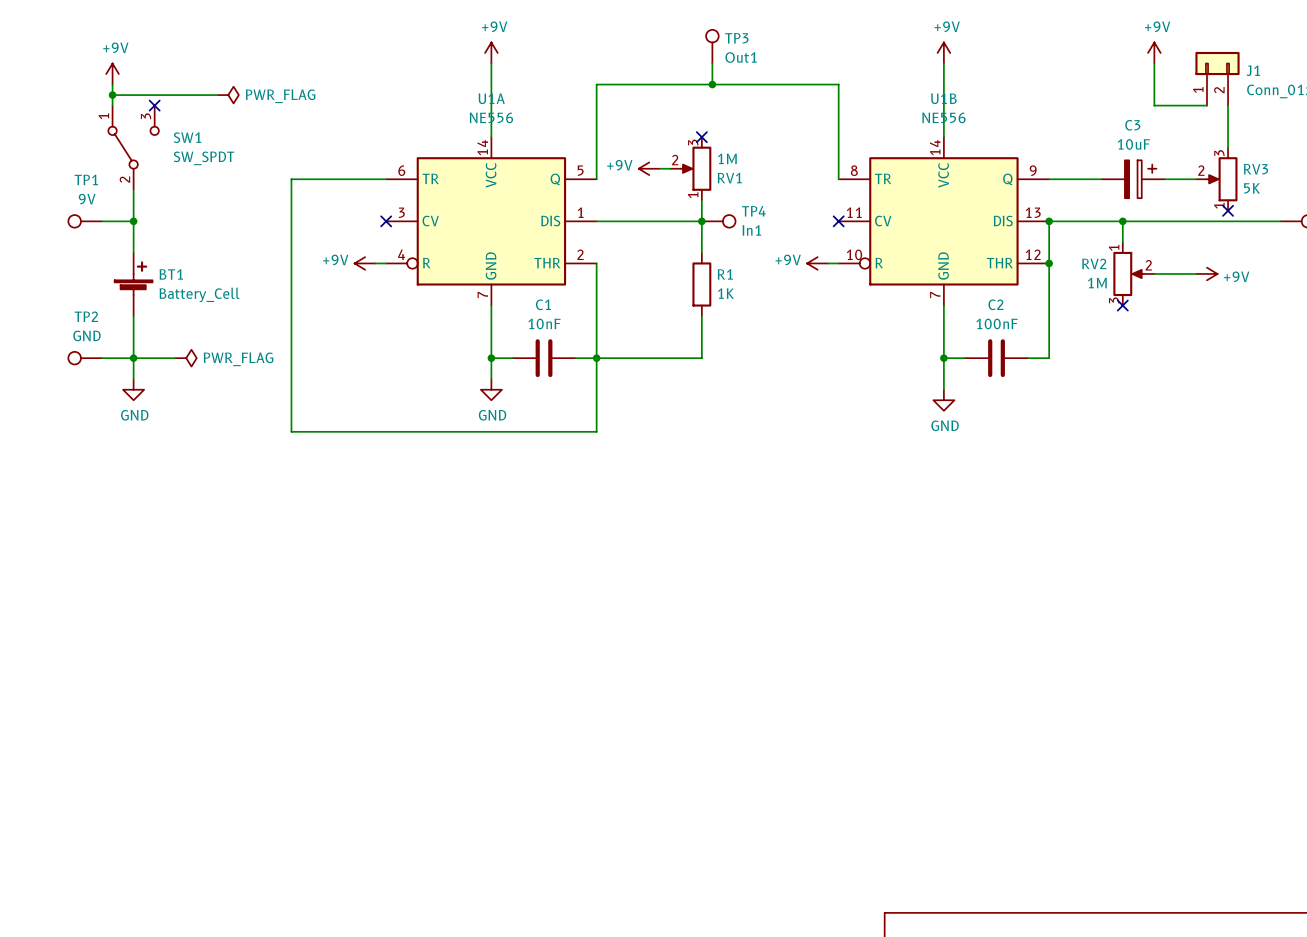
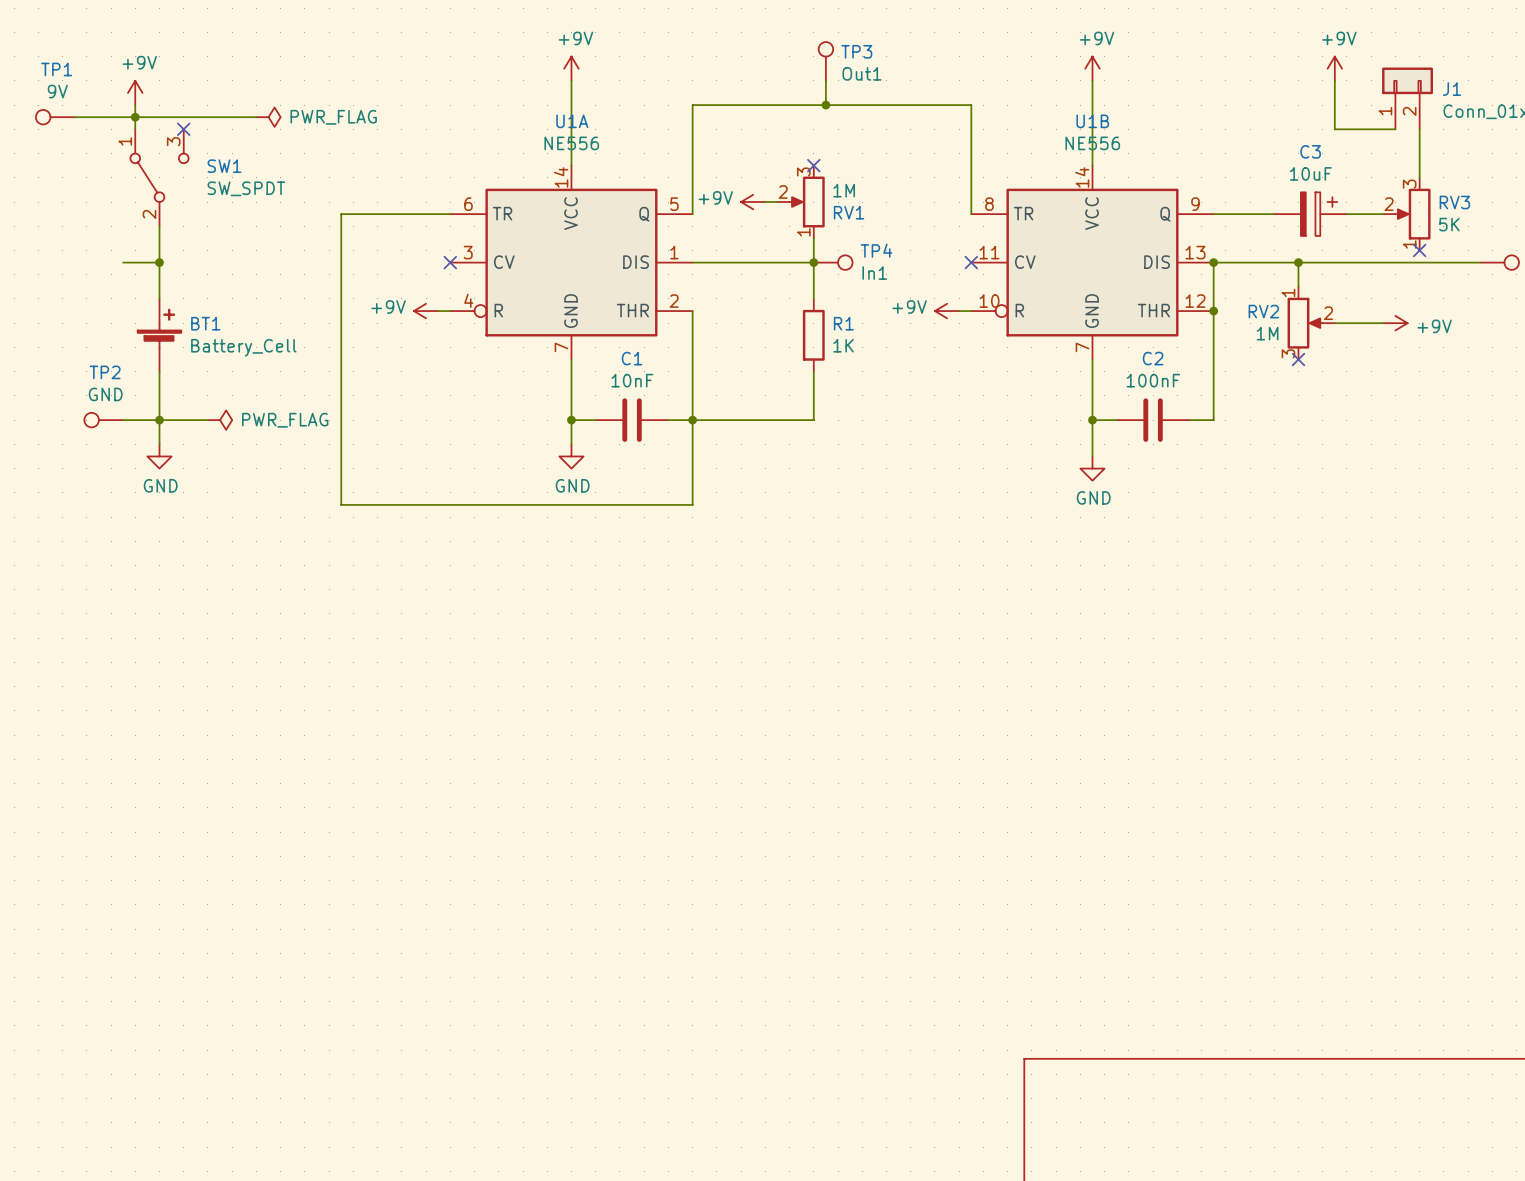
wire: none -> (74, 117) (135, 117)
TP1 position: (85, 221) -> (55, 117)

